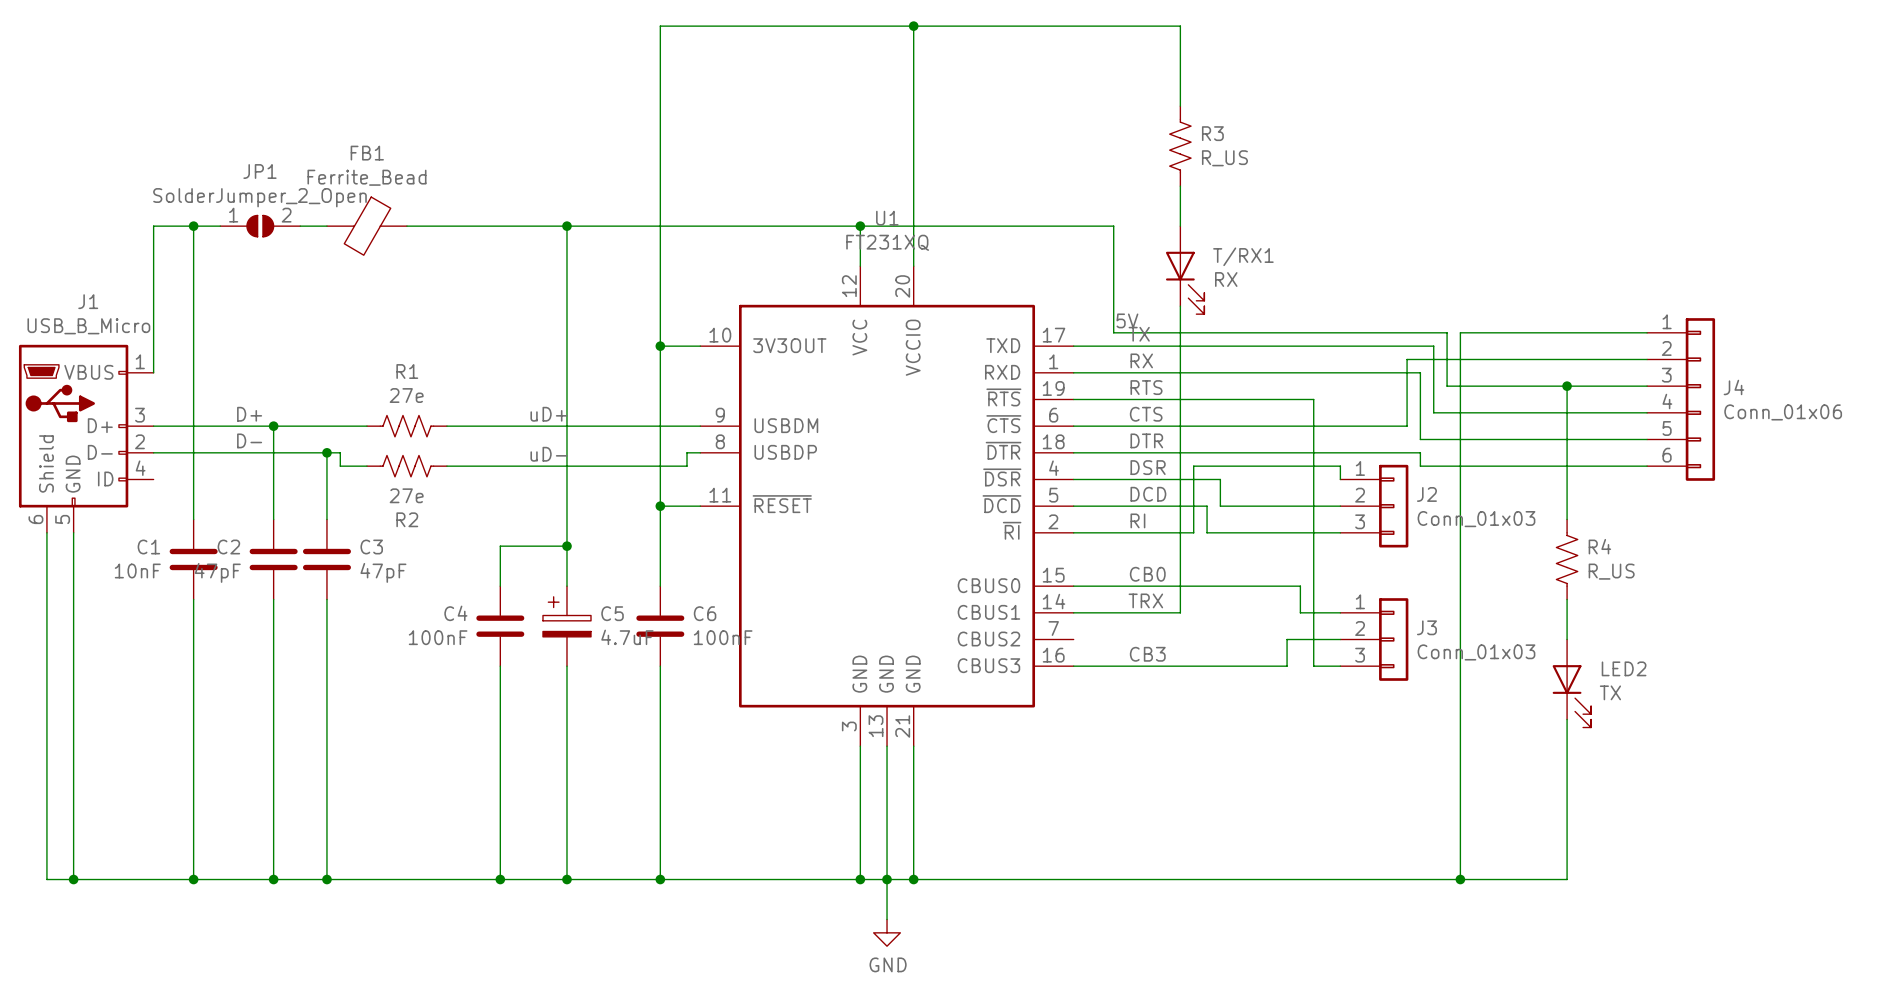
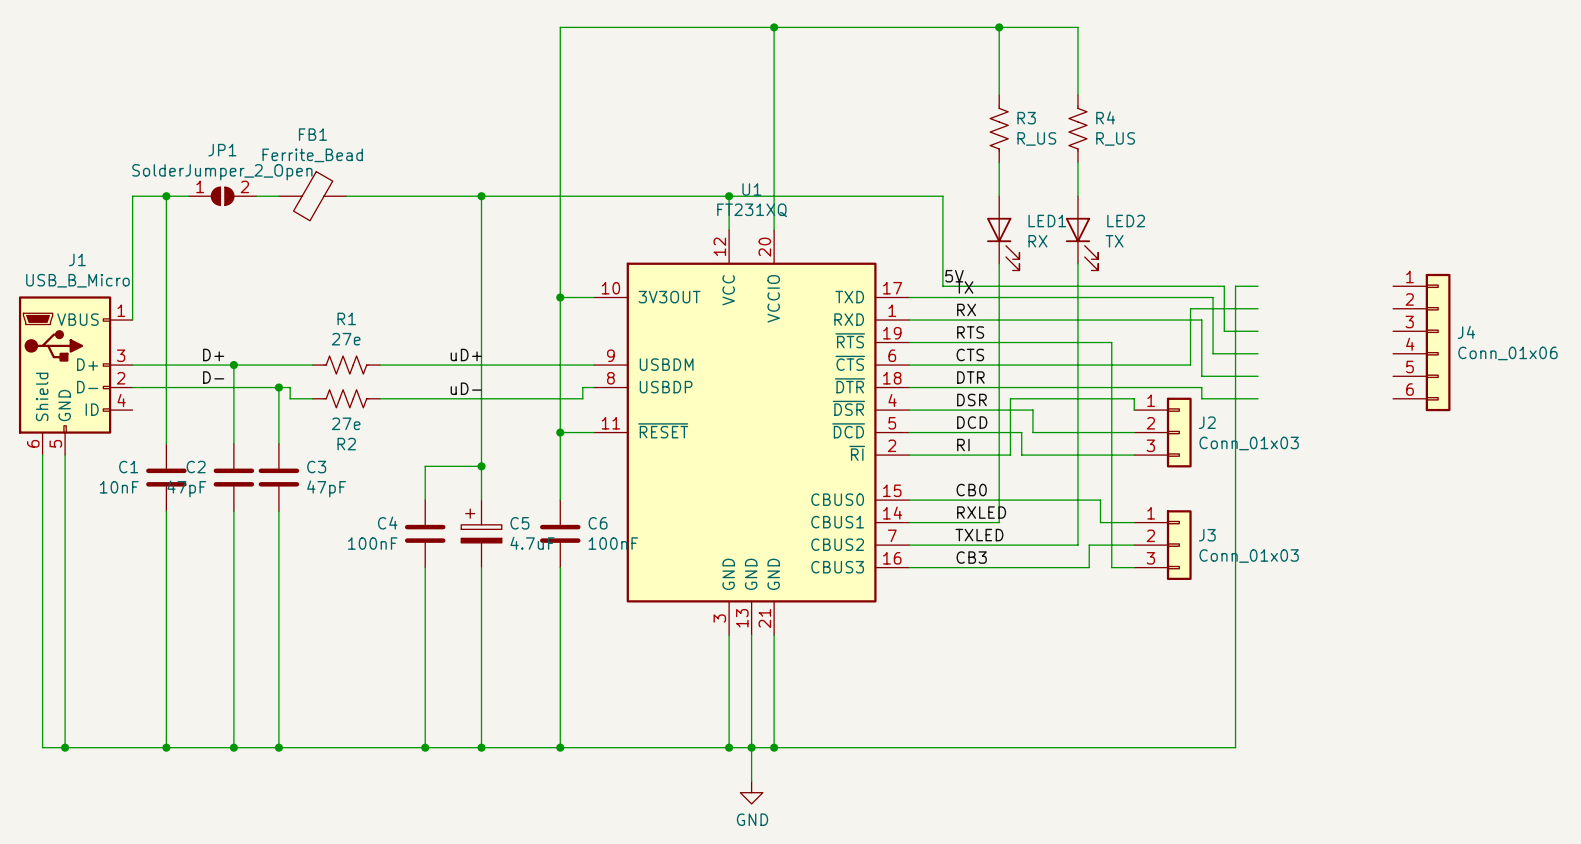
wire: none -> (999, 27) (1077, 27) (1077, 94)
junction: none -> (999, 27)
wire: none -> (1077, 162) (1077, 196)
T/RX1 name: T/RX1 (1243, 256) -> LED1 (1047, 221)
wire: none -> (1077, 263) (1077, 545) (909, 545)
wire: (1487, 332) (1647, 332) -> none
wire: (1487, 359) (1647, 359) -> none
wire: (1487, 386) (1647, 386) -> none
wire: (1567, 386) (1567, 519) -> none
junction: (1567, 386) -> none
wire: (1487, 412) (1647, 412) -> none
wire: (1487, 439) (1647, 439) -> none
wire: (1487, 466) (1647, 466) -> none
R4 position: (1567, 559) -> (1077, 128)
wire: (1567, 599) (1567, 639) -> none
label: TRX (1145, 600) -> RXLED (981, 512)
label: none -> TXLED (979, 535)
LED2 position: (1571, 683) -> (1082, 233)
wire: (1567, 719) (1567, 879) (1460, 879) -> none
junction: (1460, 879) -> none

